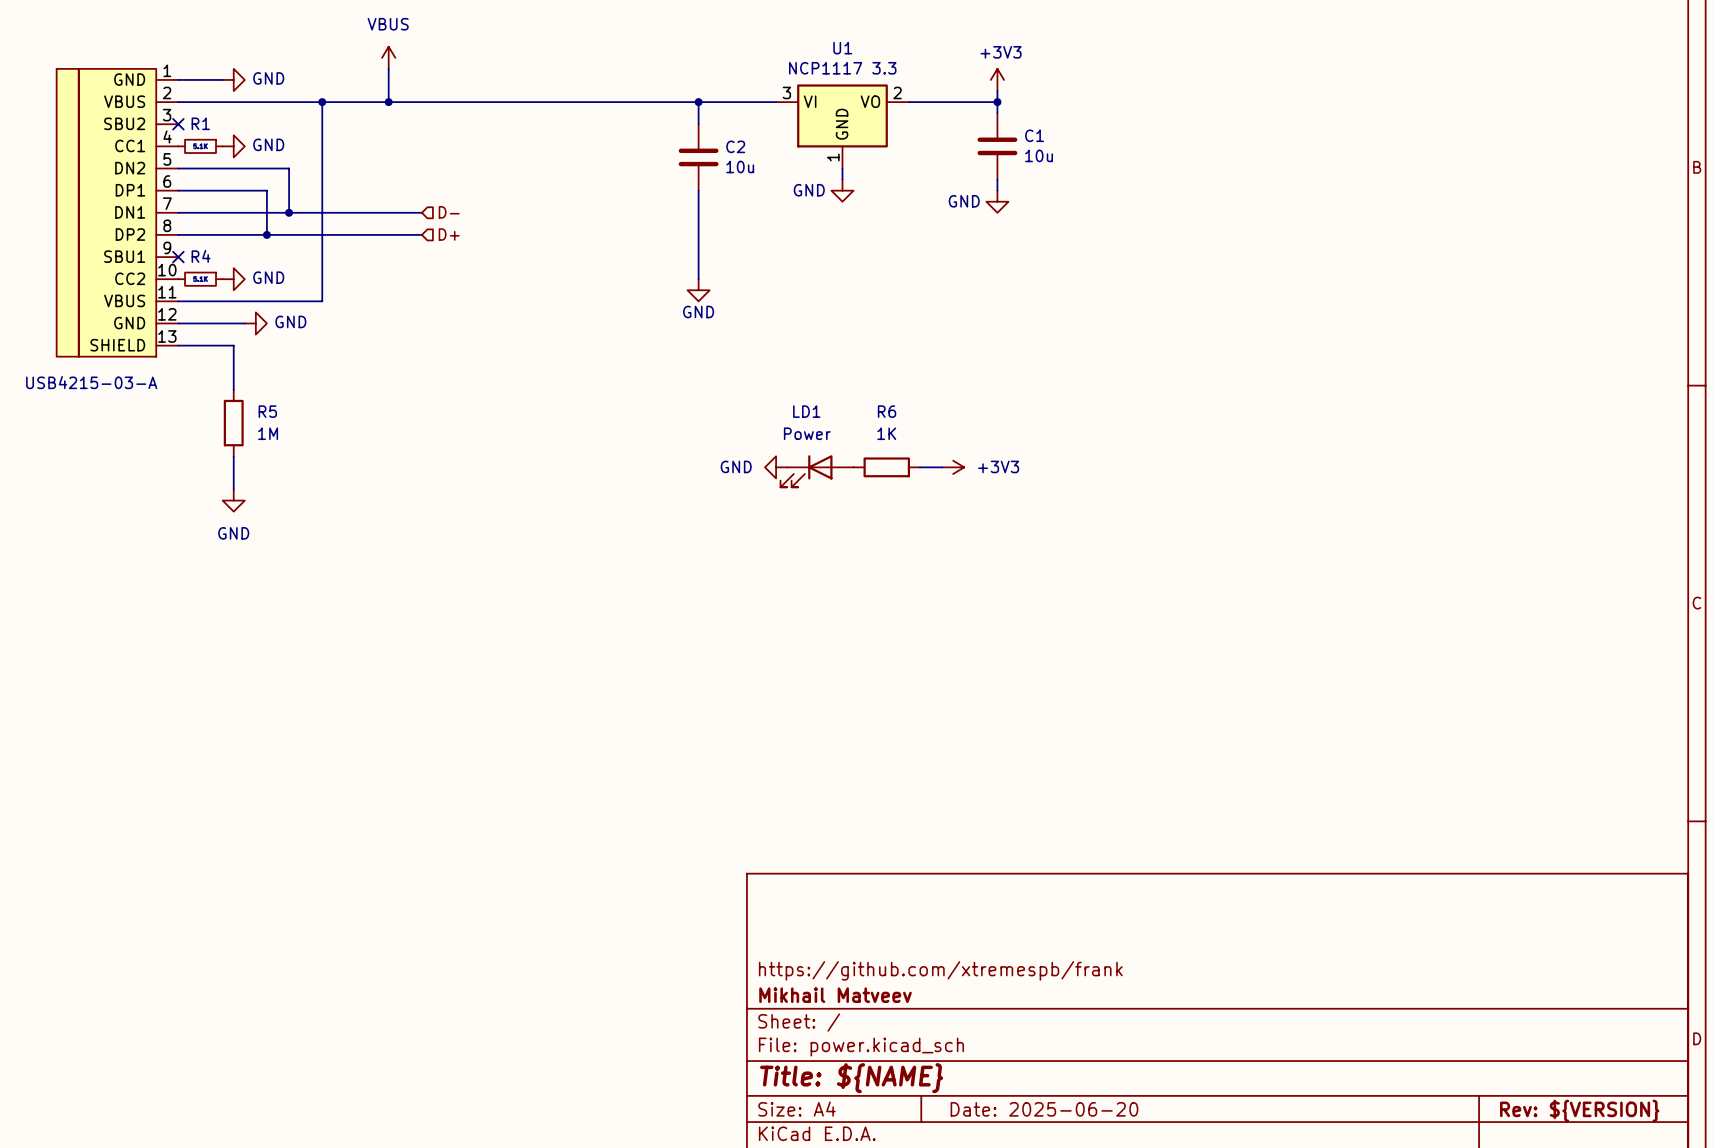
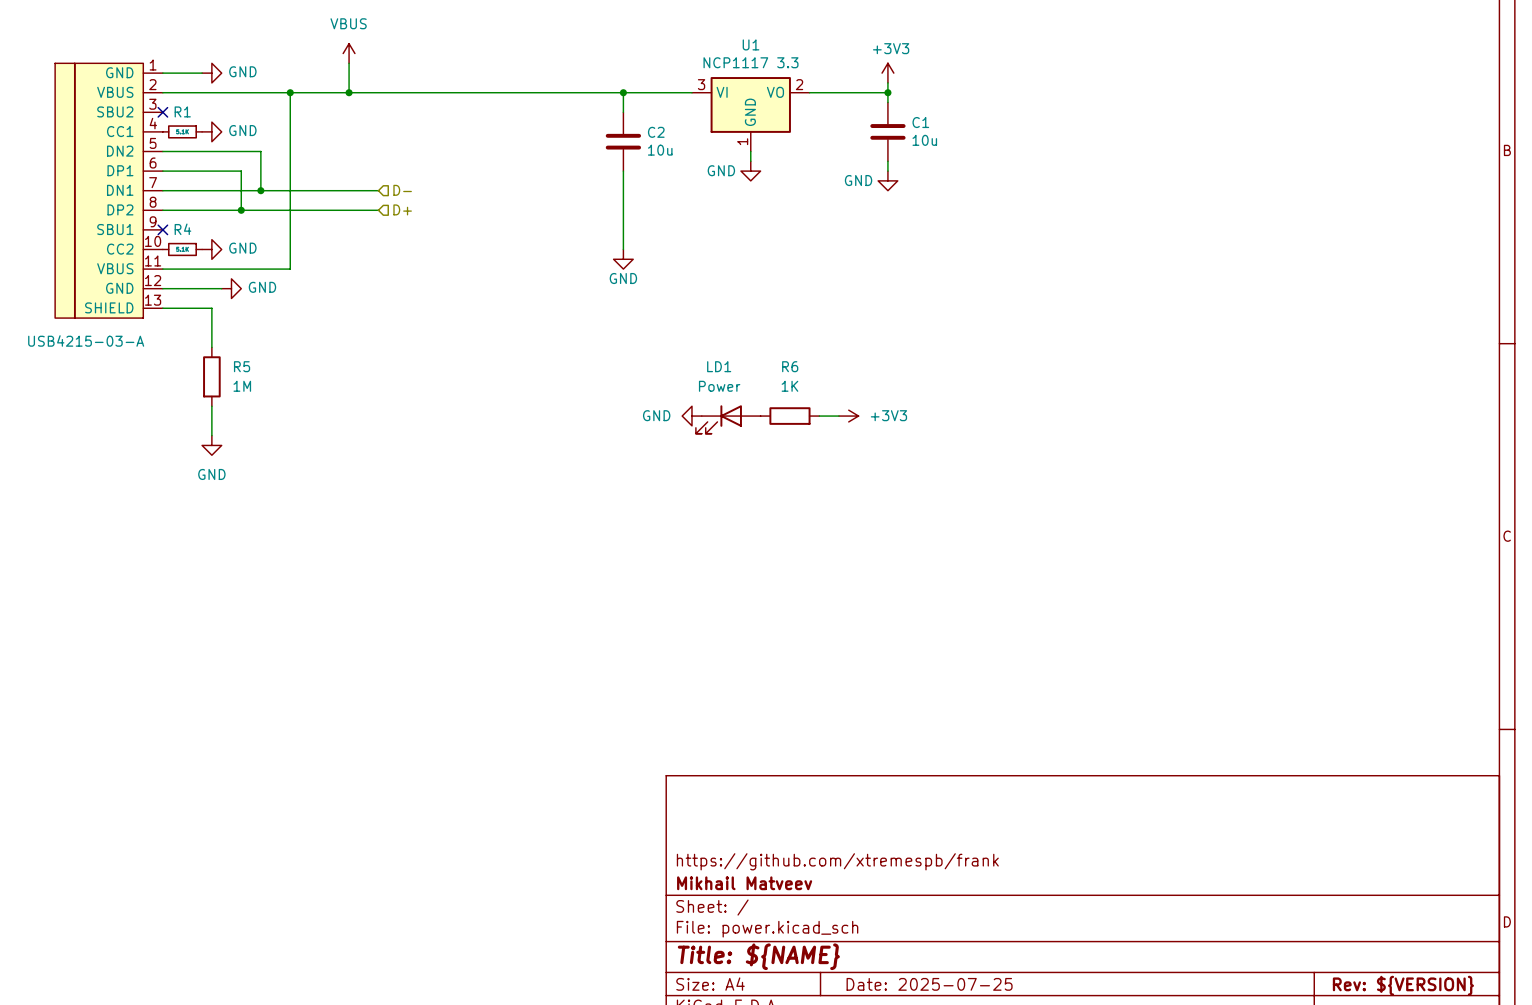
title block: Date: 2025-06-20 (1044, 1109) -> Date: 2025-07-25 (929, 984)

